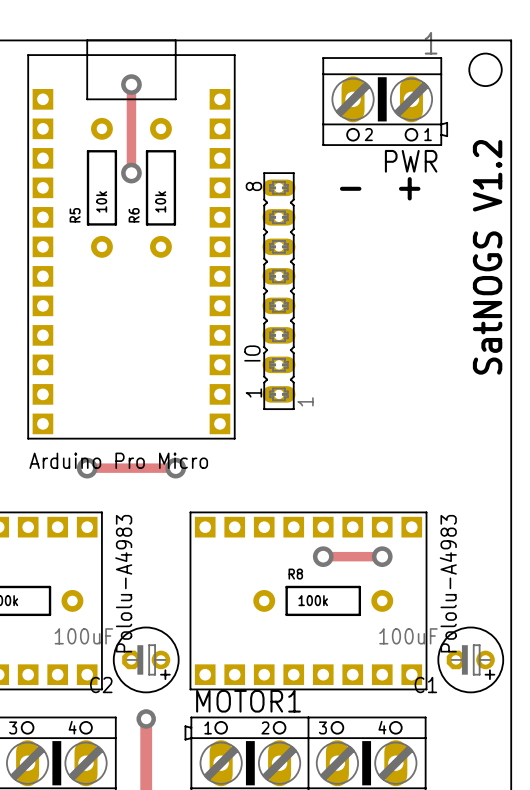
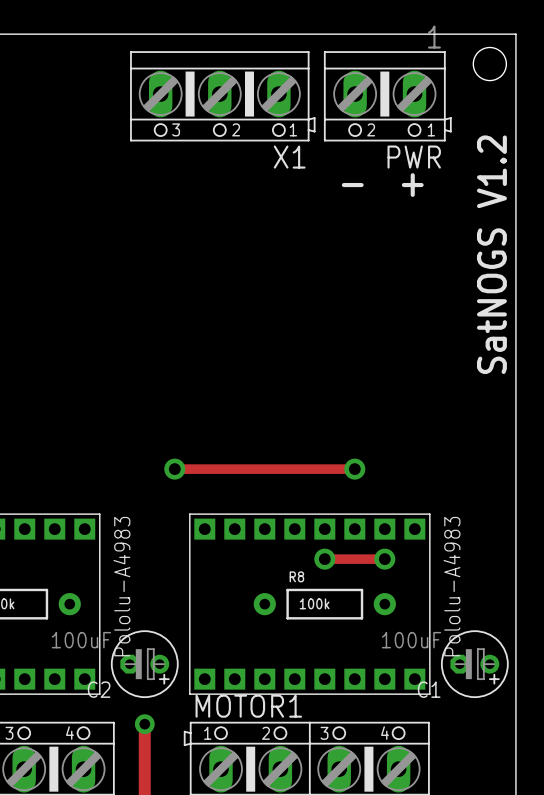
track: (131, 84) (131, 173) -> none
via: (131, 84) -> none
X1: none -> (222, 96)
via: (131, 173) -> none
R5: 10k (101, 187) -> none
R6: 10k (160, 187) -> none
part: (131, 239) -> none
IO: 1 (278, 291) -> none
track: (87, 468) (175, 468) -> (354, 469) (174, 469)
via: (87, 468) -> none
via: none -> (354, 469)

